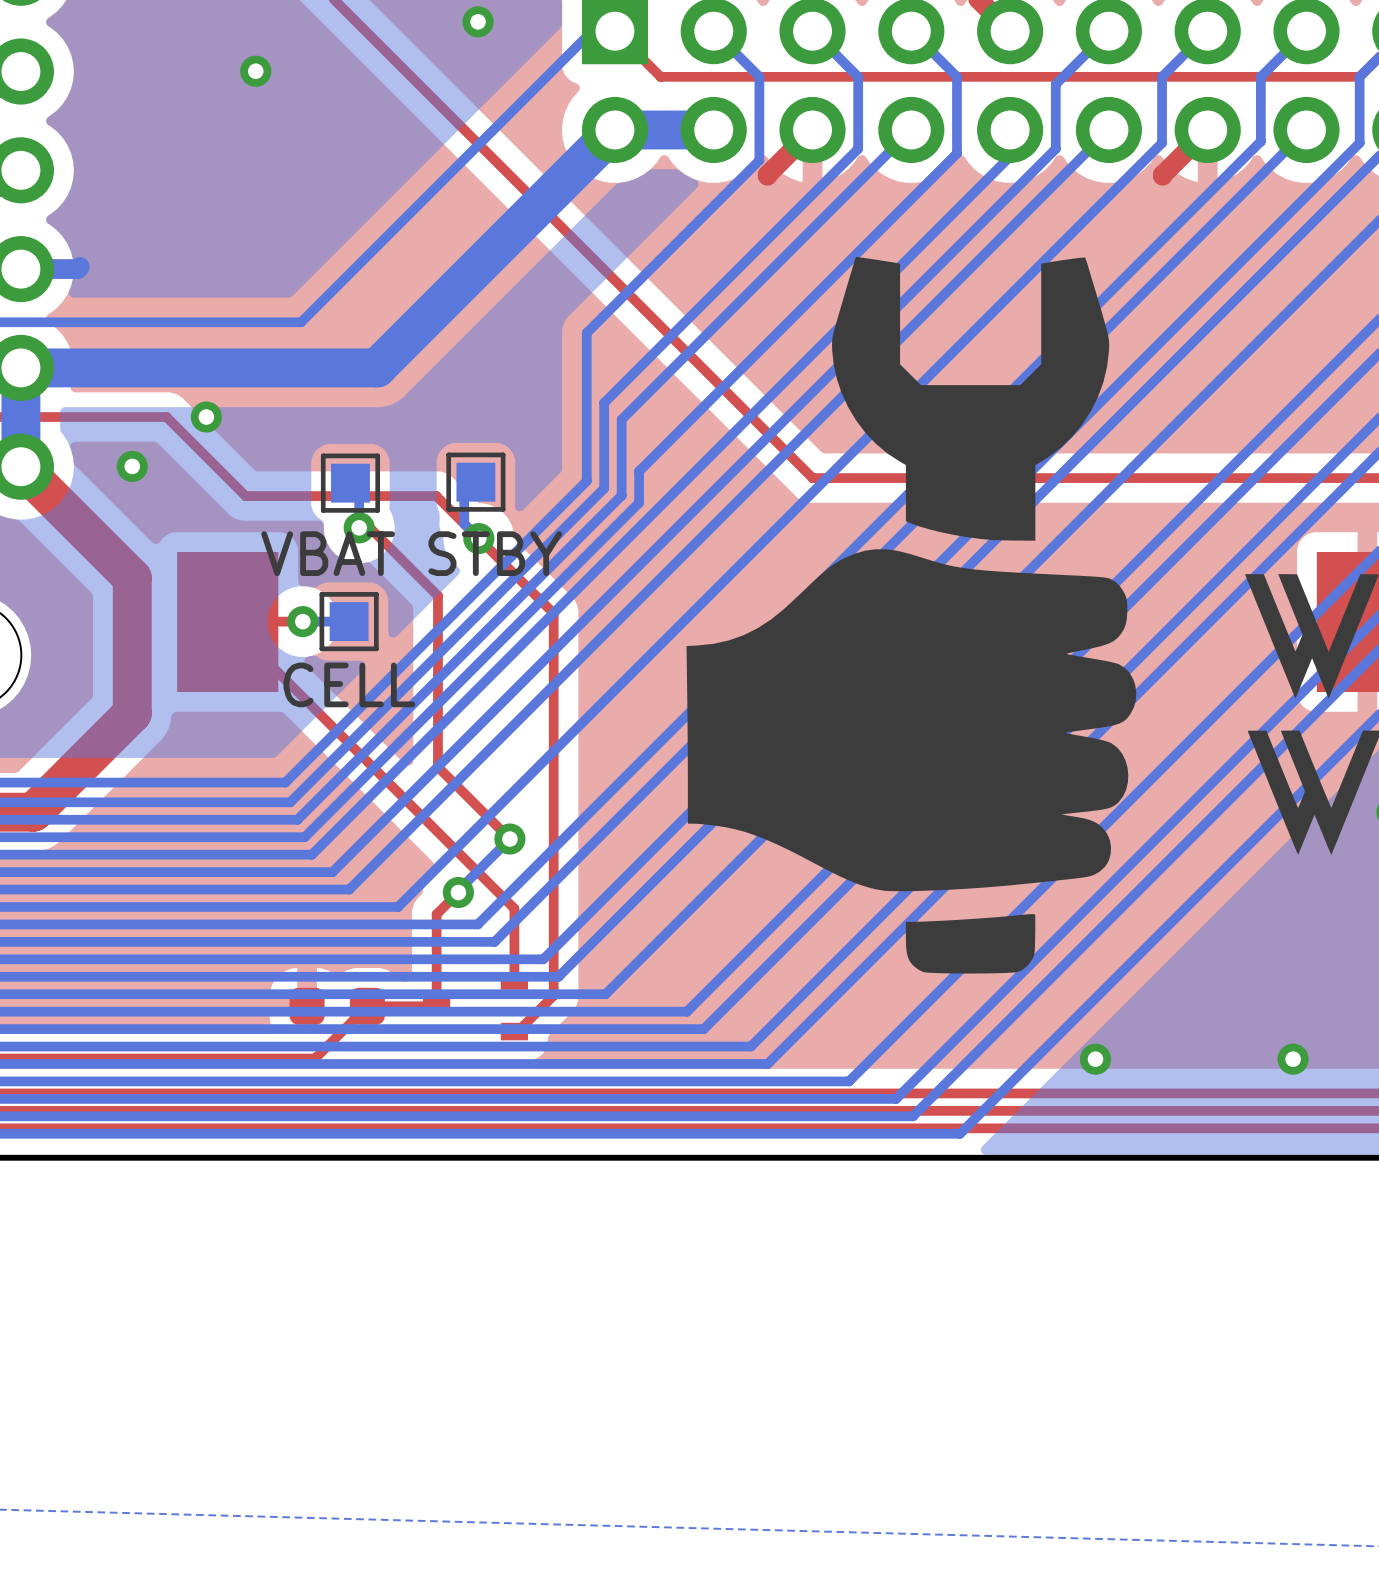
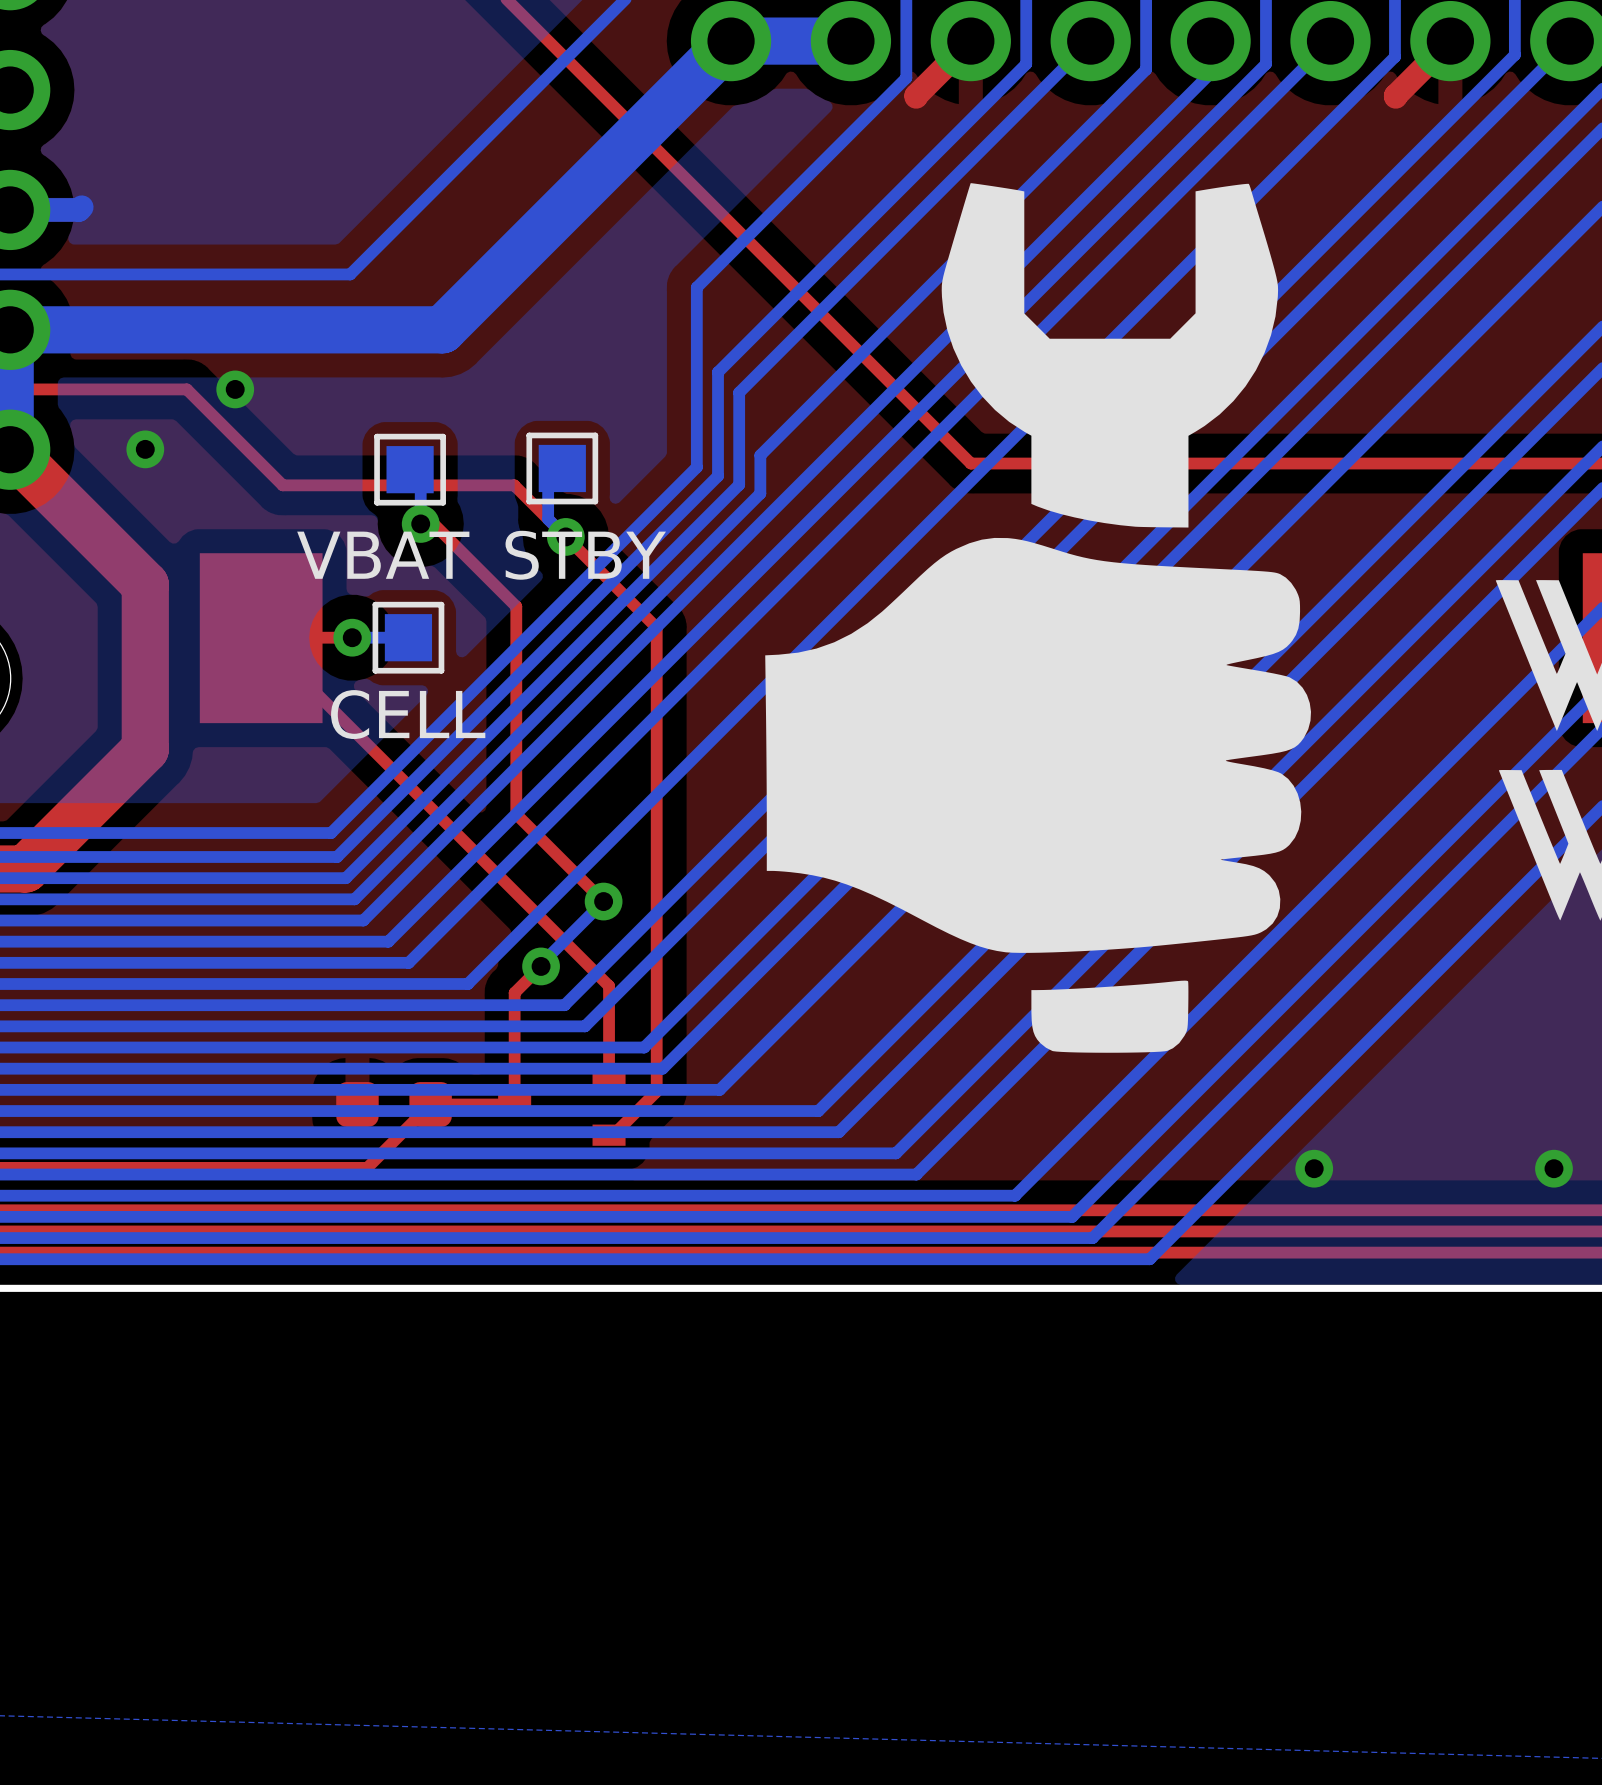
drawing position: (911, 615) -> (1038, 617)

